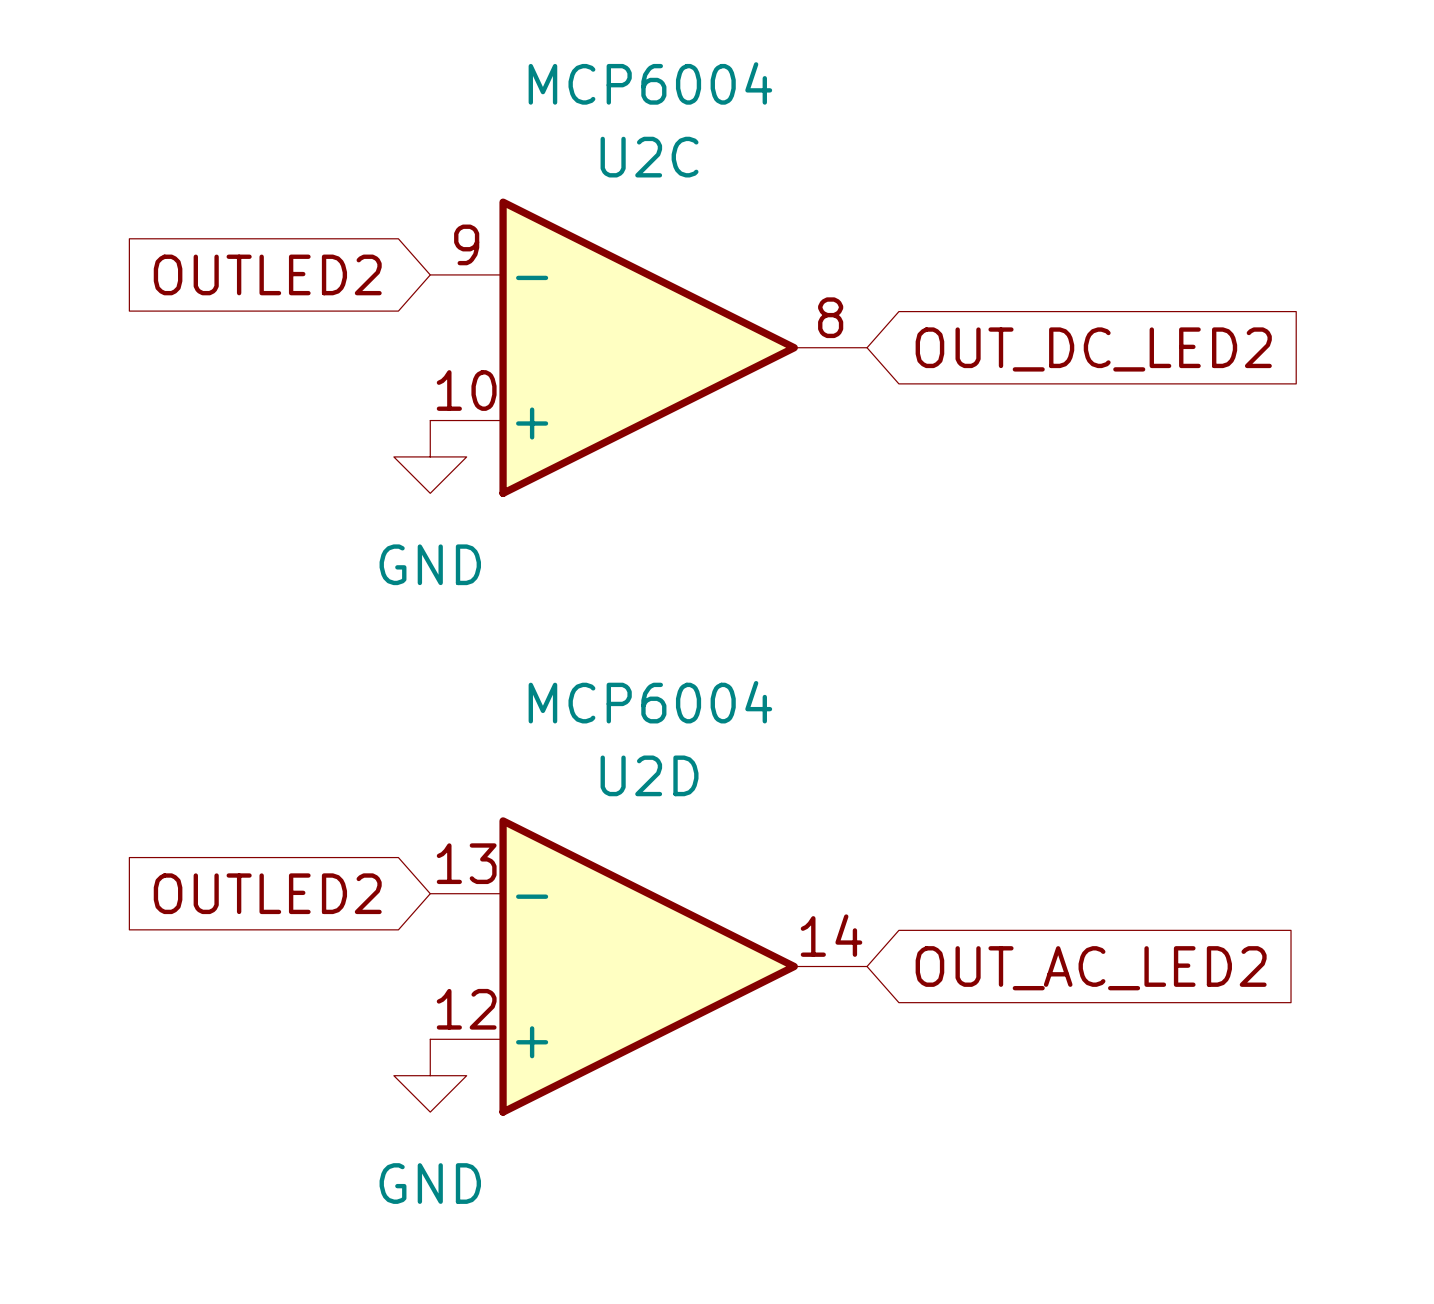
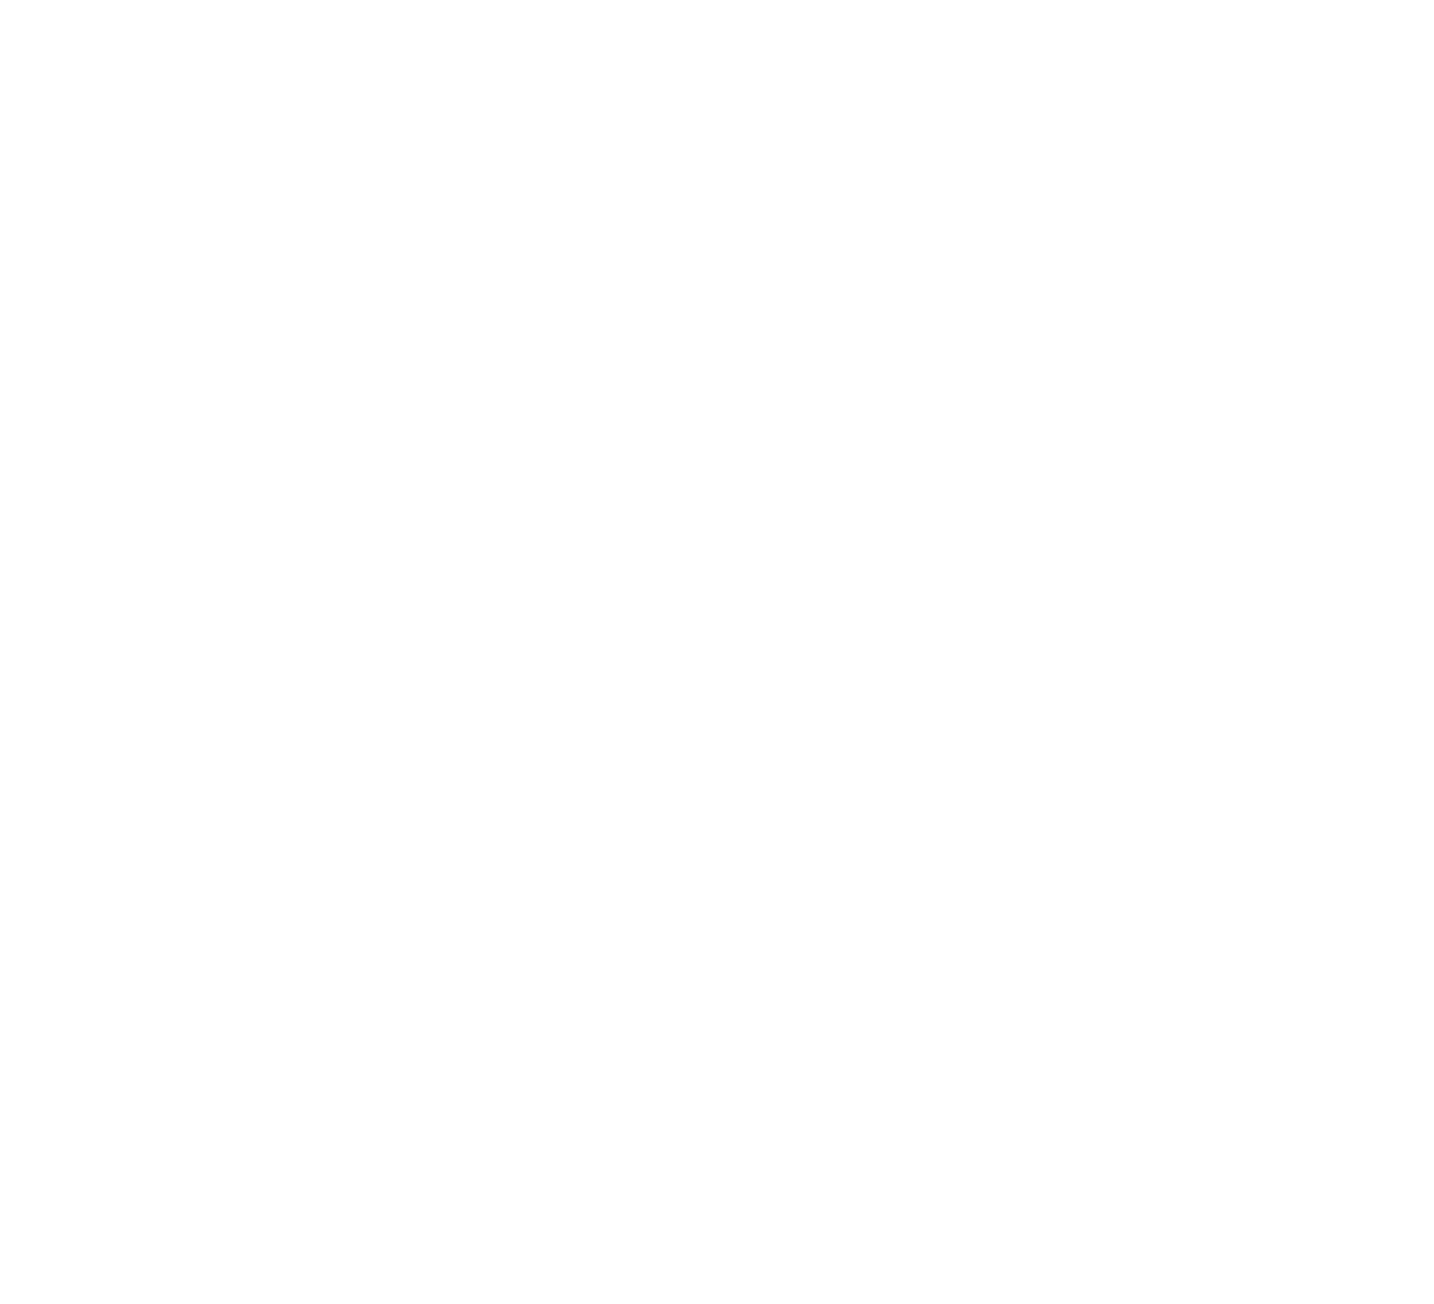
global label: OUTLED2 (267, 274) -> none
U2C: MCP6004 (648, 347) -> none
global label: OUT_DC_LED2 (1093, 349) -> none
power symbol: GND (430, 456) -> none
global label: OUTLED2 (267, 893) -> none
U2D: MCP6004 (648, 966) -> none
global label: OUT_AC_LED2 (1091, 968) -> none
power symbol: GND (430, 1075) -> none

